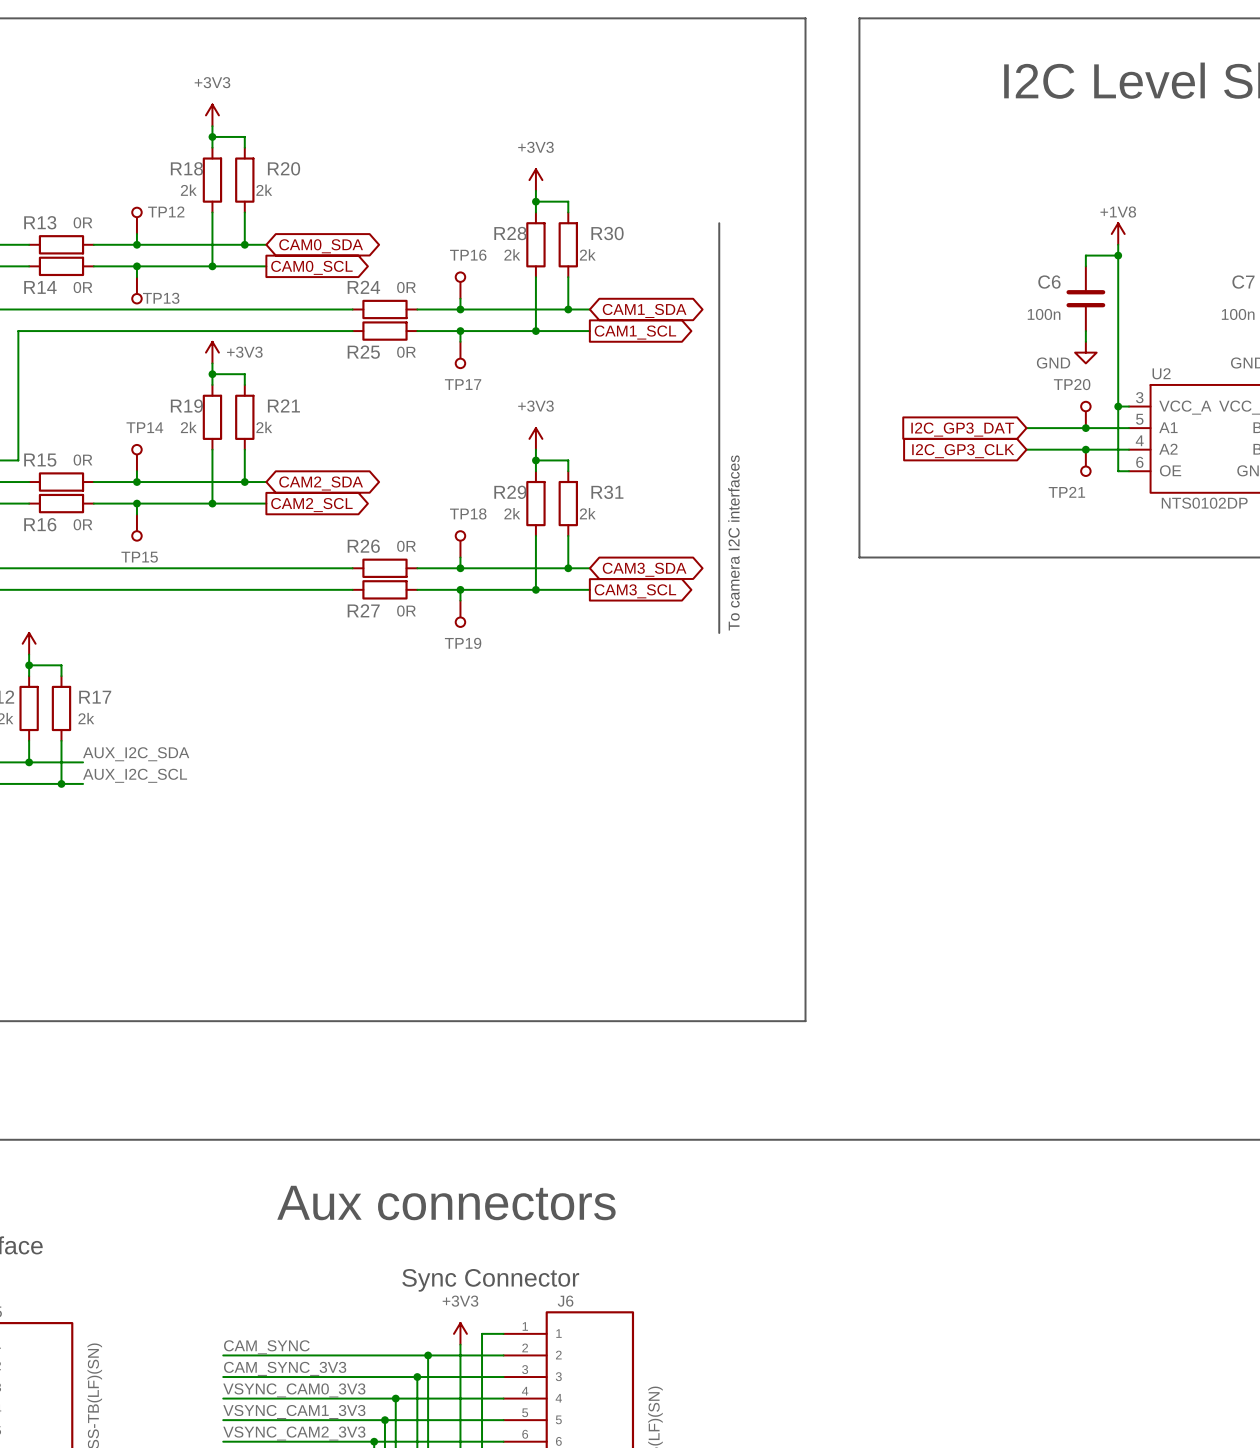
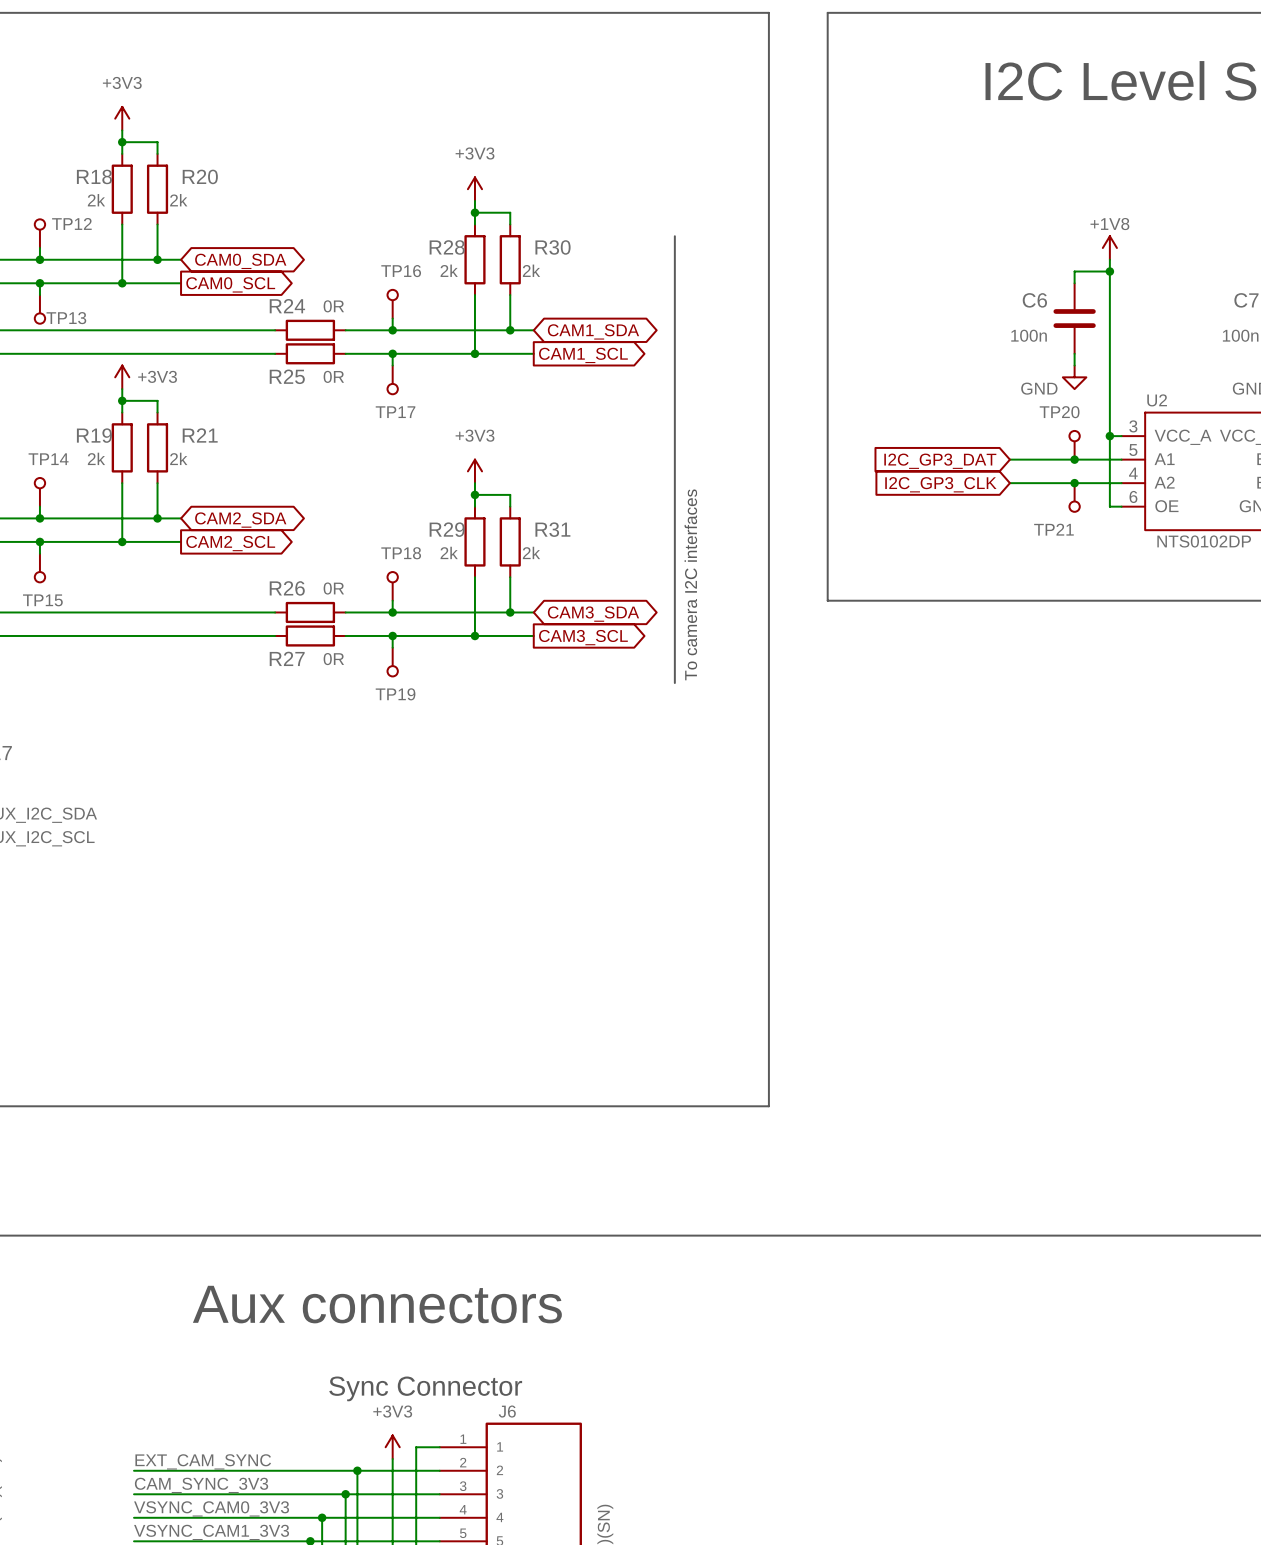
label: CAM_SYNC (266, 1347) -> EXT_CAM_SYNC (203, 1461)

